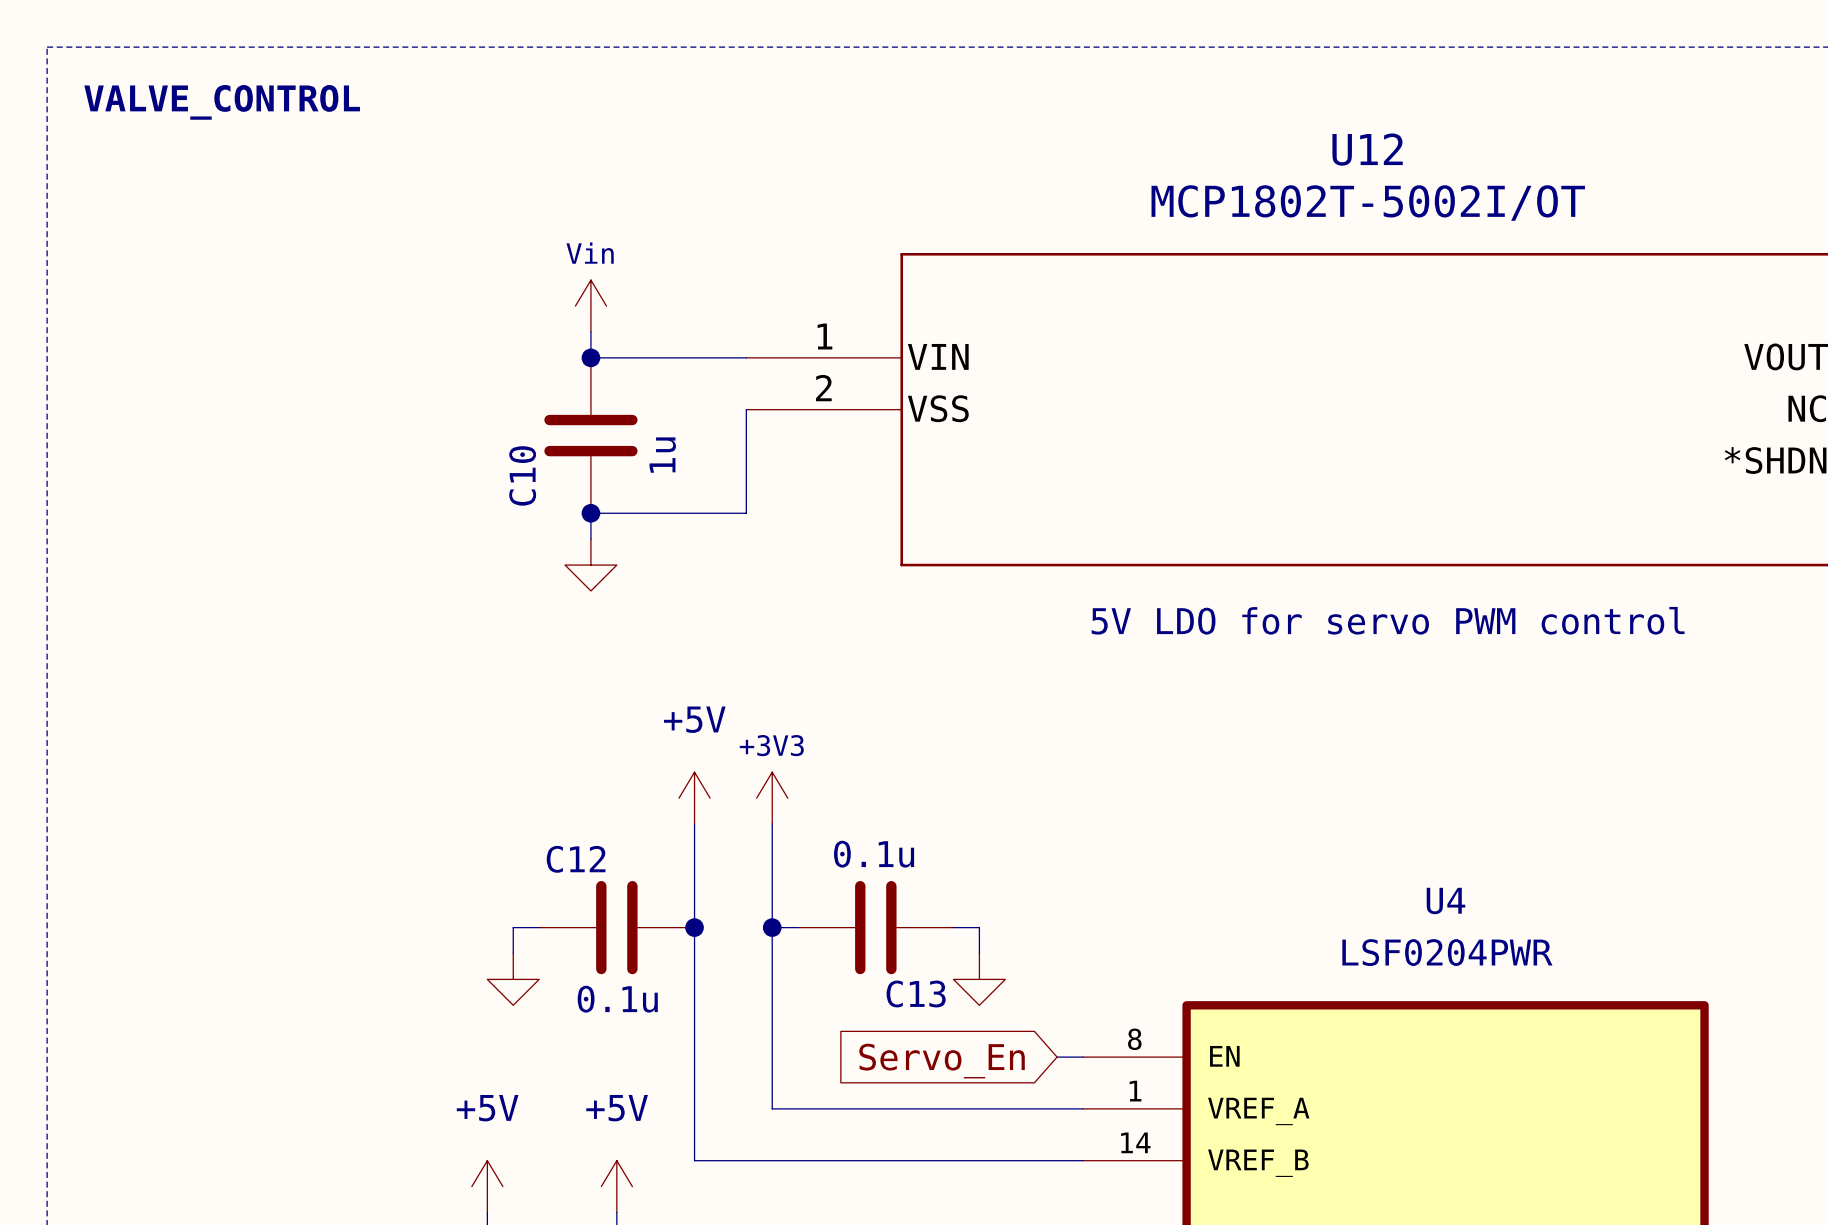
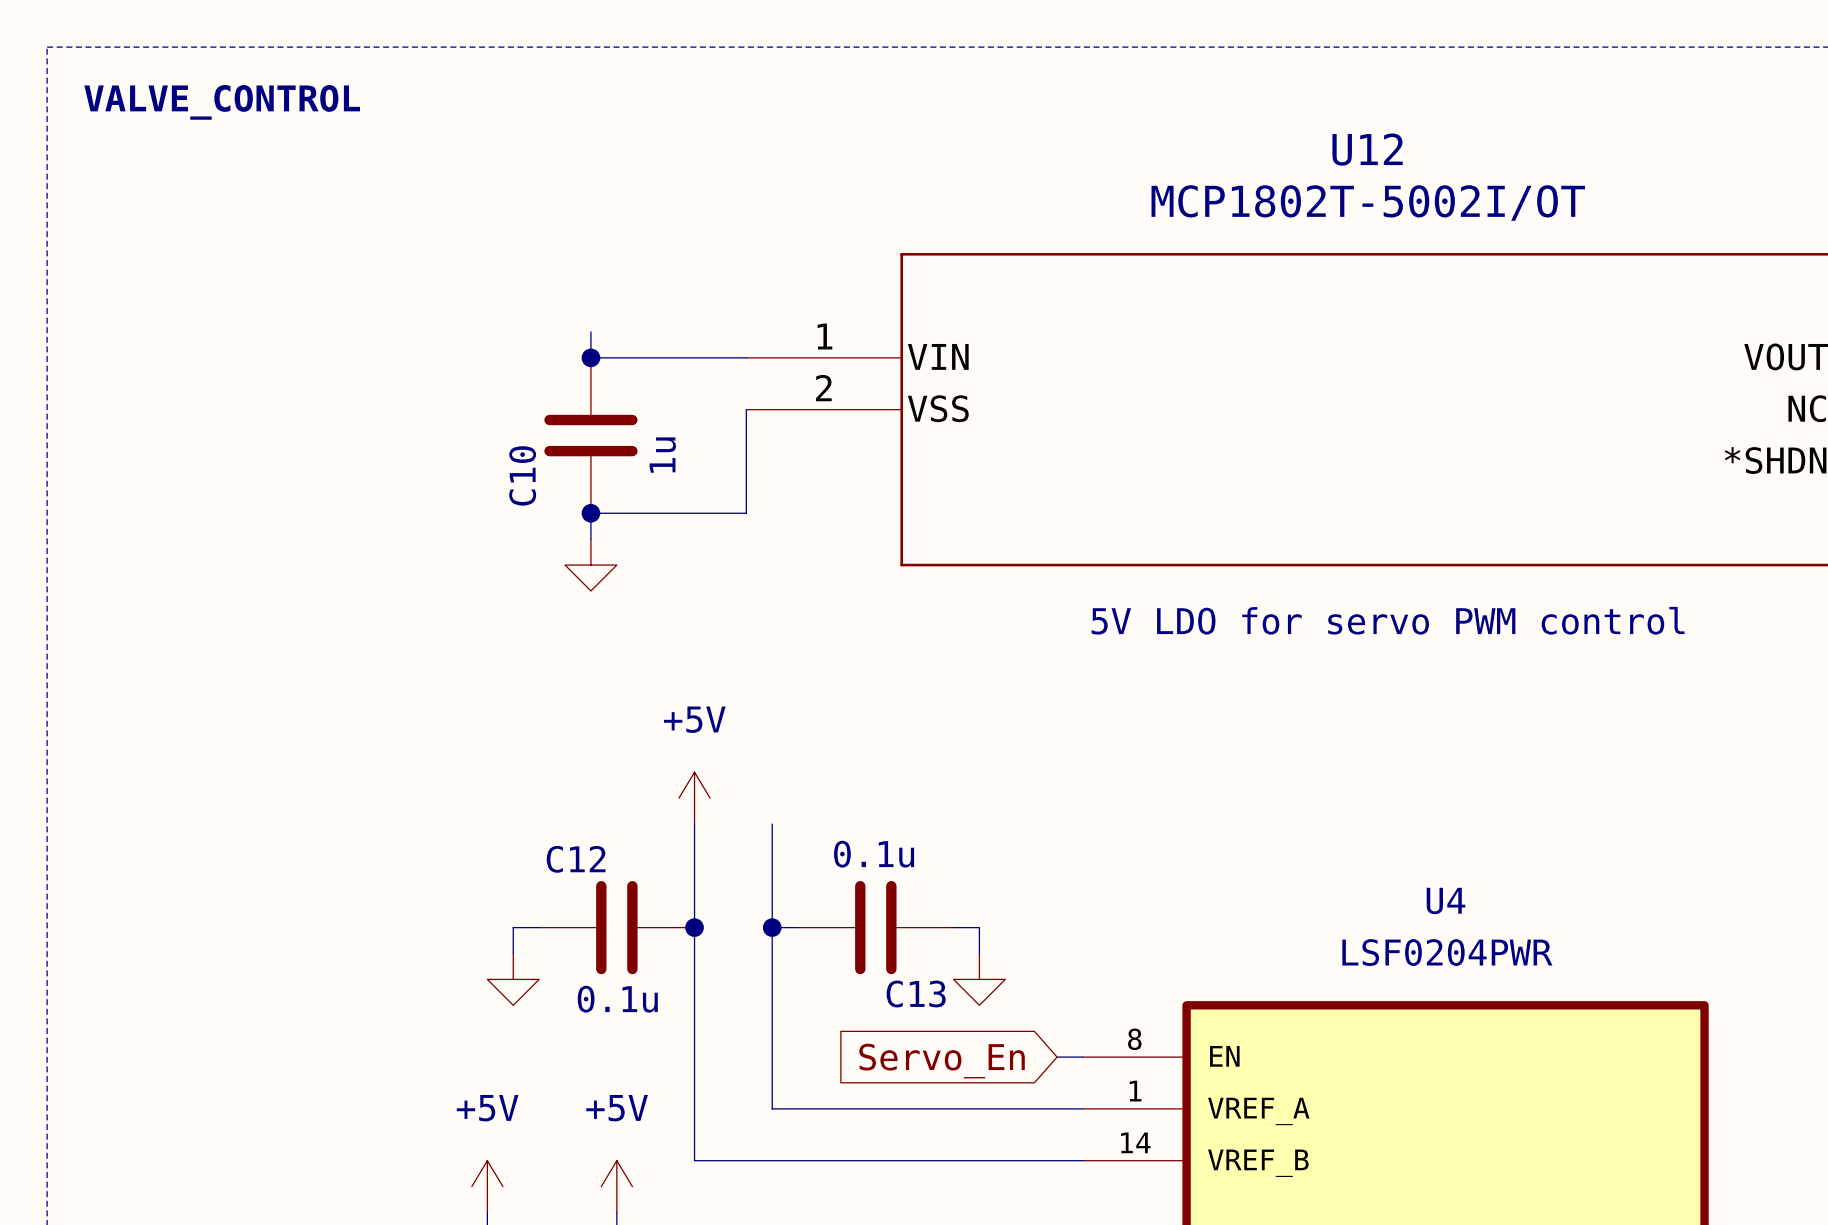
power symbol: Vin (590, 306) -> none
power symbol: +3V3 (772, 798) -> none

